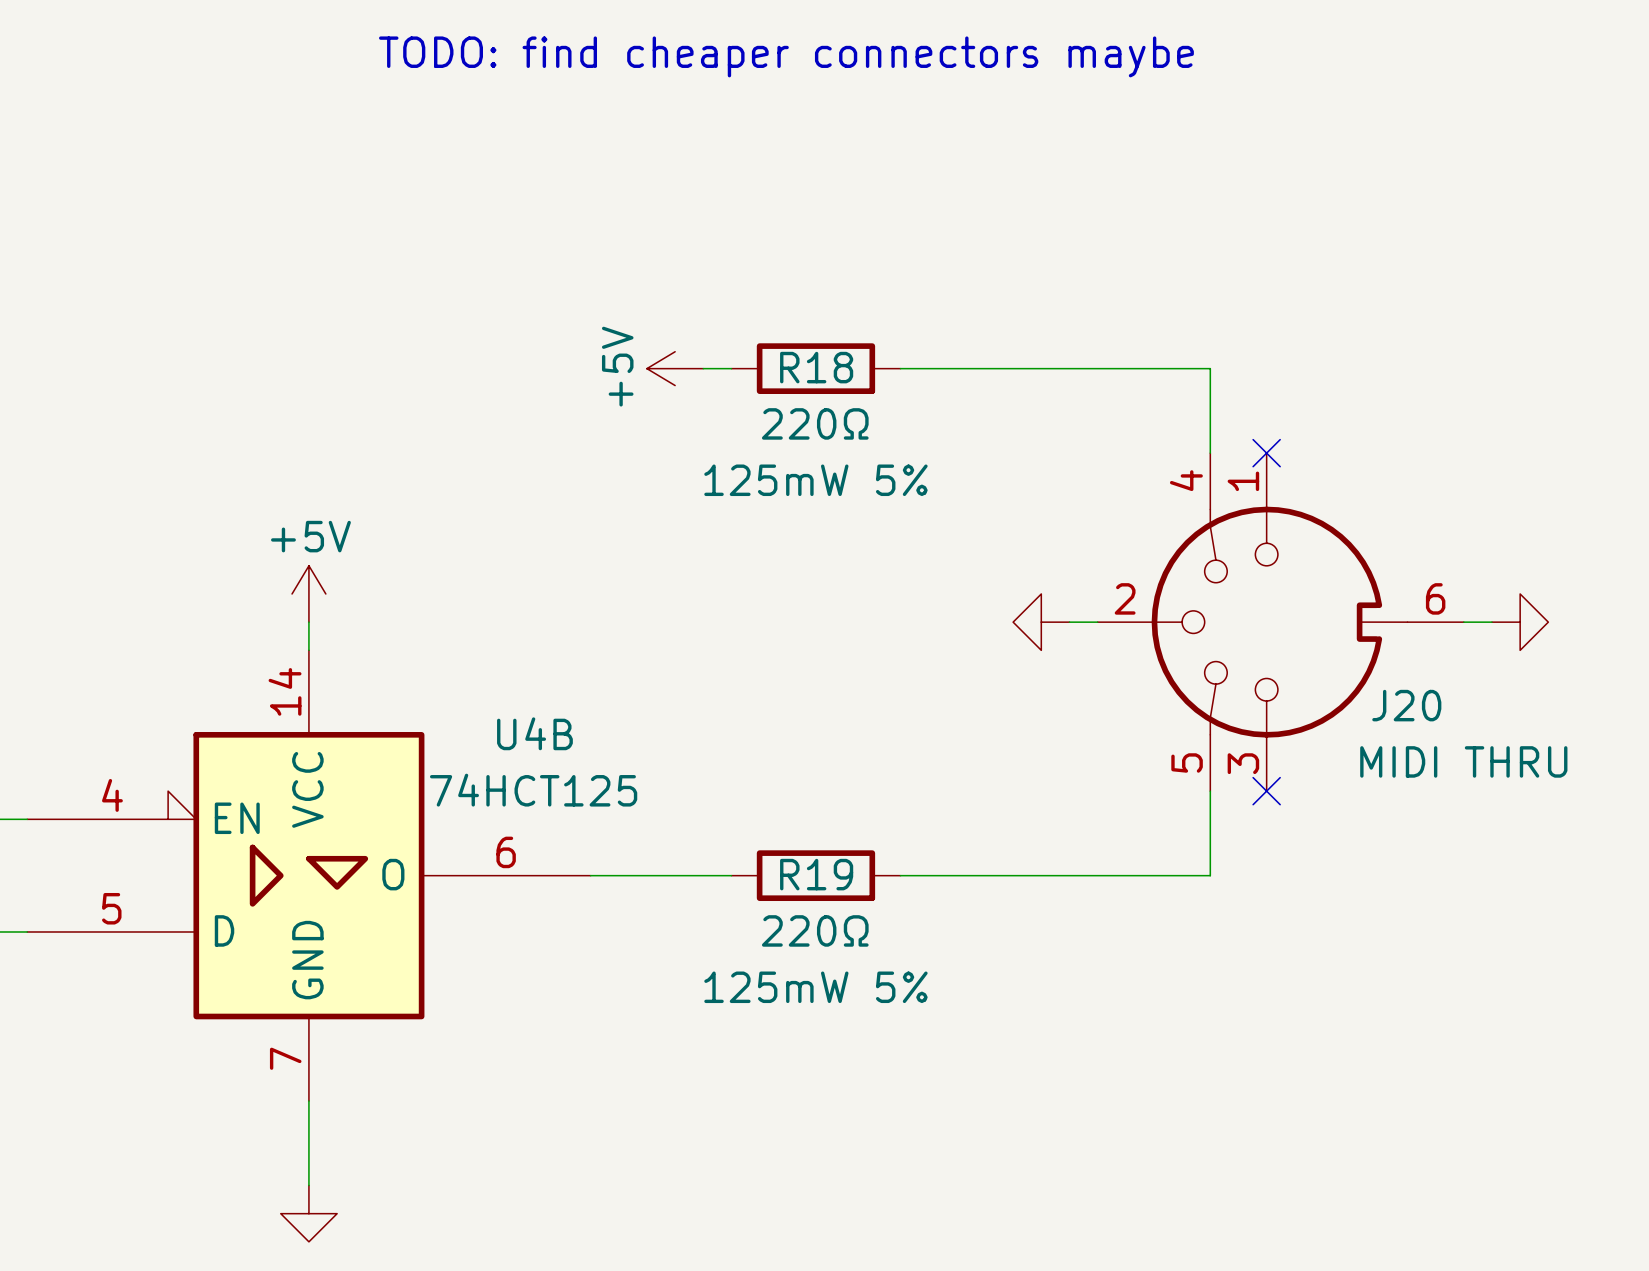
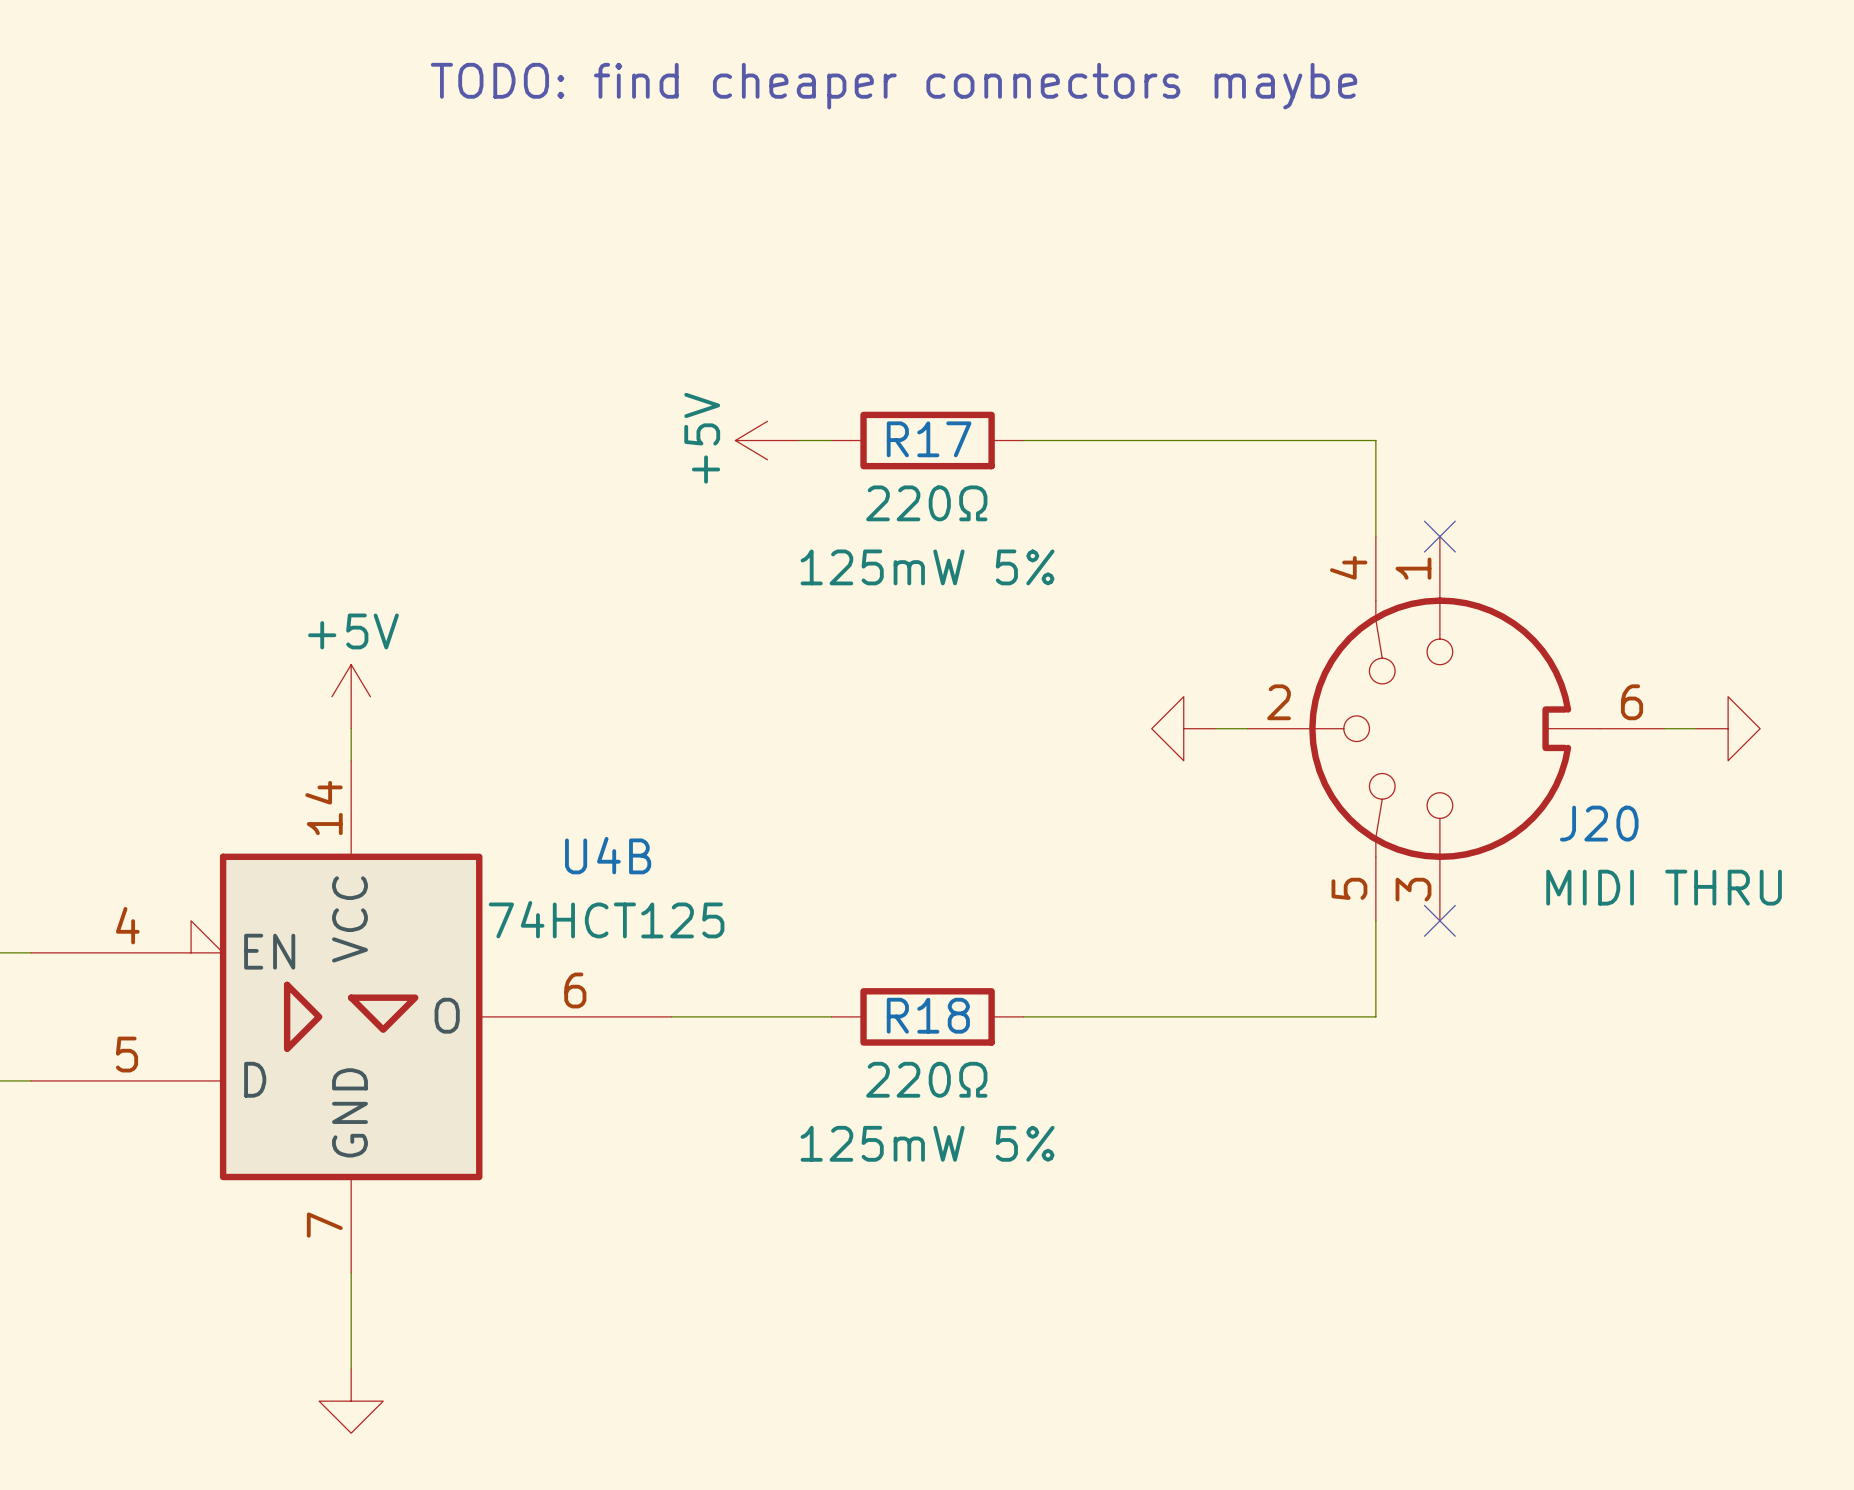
R18 name: R18 (816, 367) -> R17 (929, 439)
R19 name: R19 (816, 874) -> R18 (928, 1015)

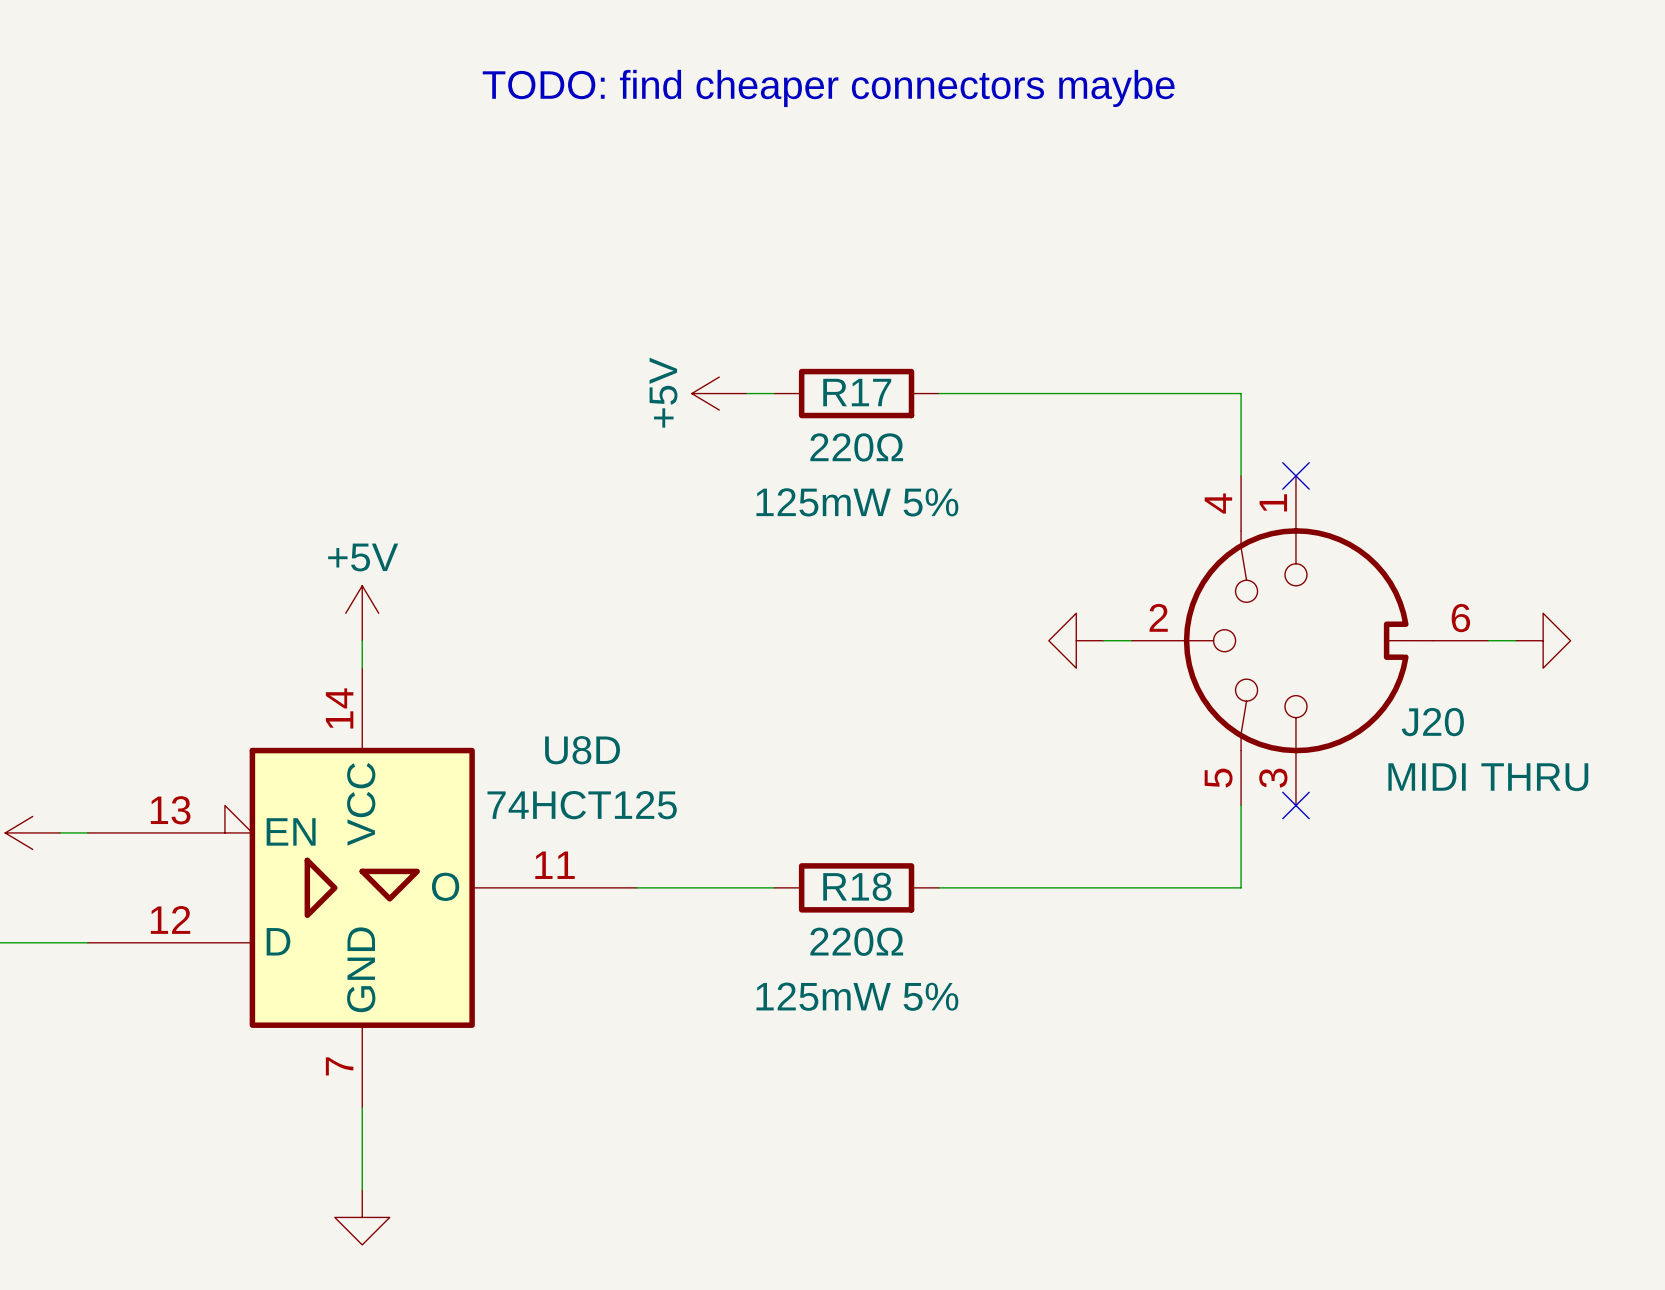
U4B name: U4B (608, 855) -> U8D (582, 750)
U4B pin number: 4 (127, 925) -> 13 (170, 810)
U4B pin number: 6 (575, 990) -> 11 (555, 865)
U4B pin number: 5 (127, 1054) -> 12 (170, 919)

